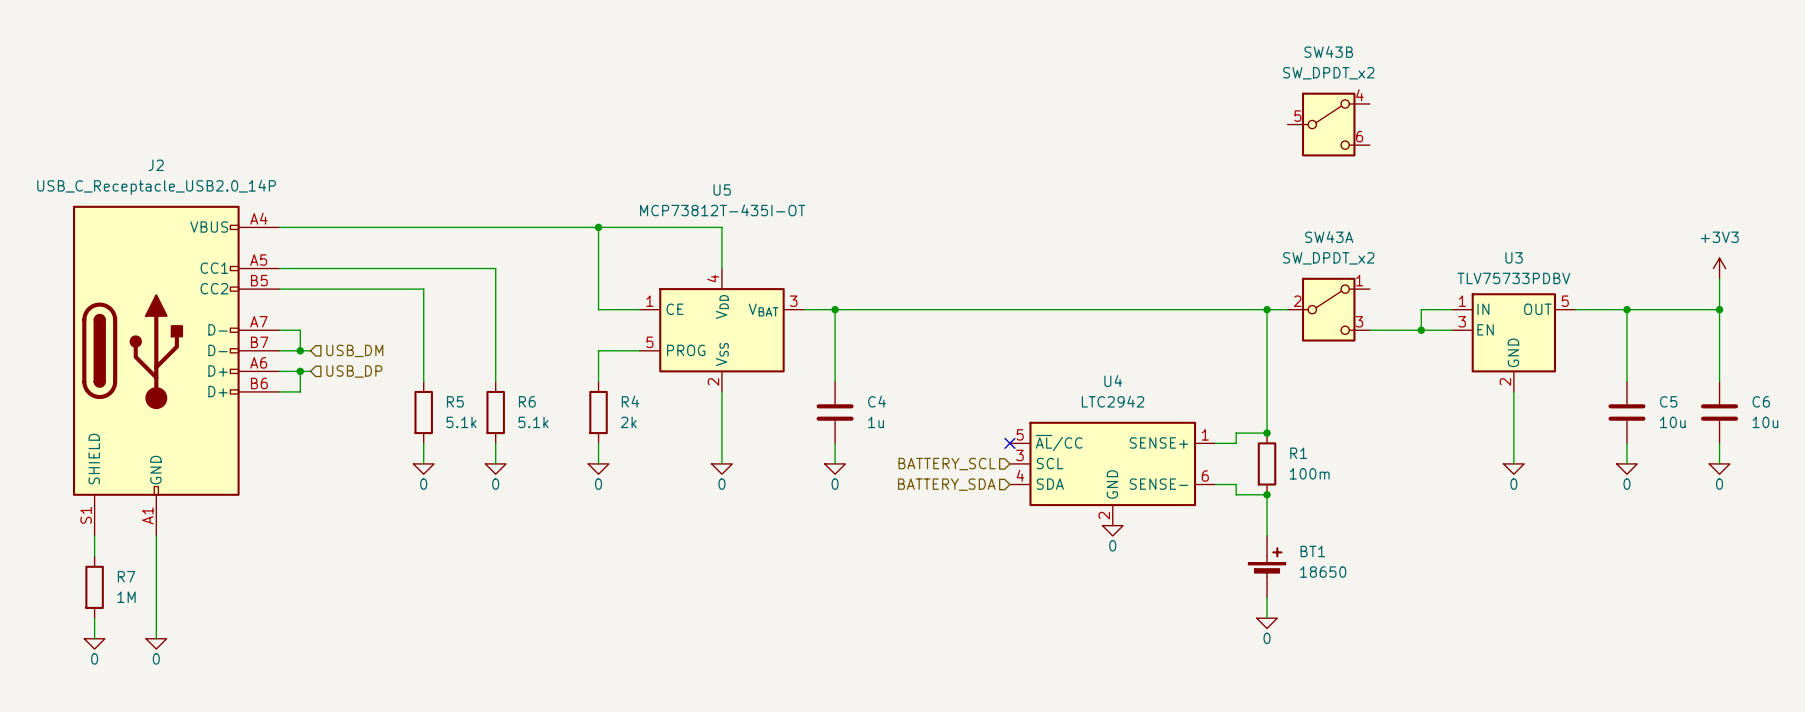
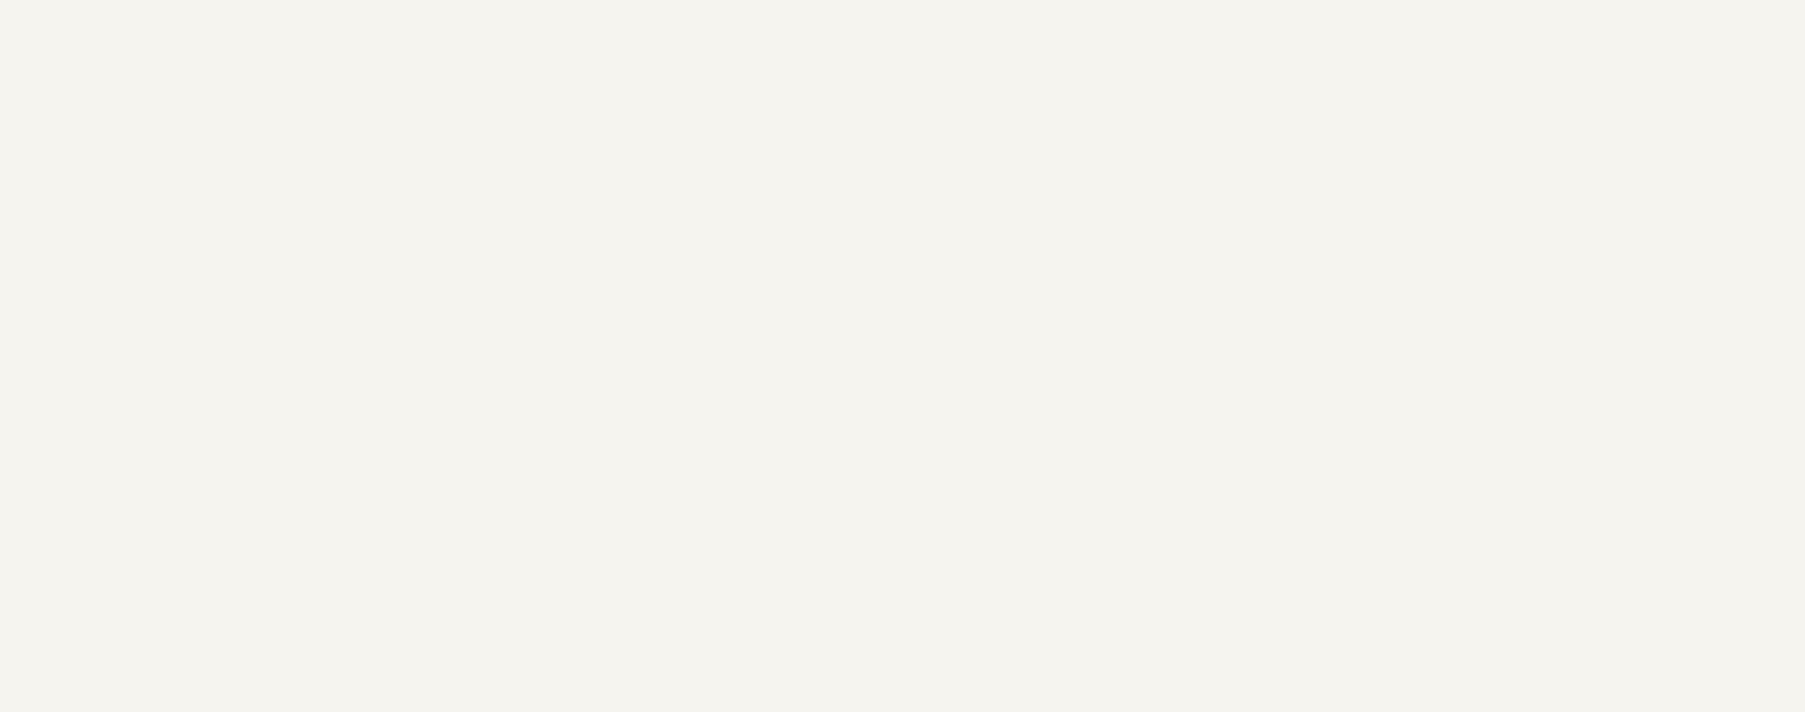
SW43B: SW_DPDT_x2 (1328, 124) -> none
wire: (279, 227) (721, 227) (721, 268) -> none
wire: (598, 227) (598, 309) (639, 309) -> none
junction: (598, 227) -> none
wire: (279, 268) (495, 268) (495, 381) -> none
power symbol: +3V3 (1719, 268) -> none
wire: (1719, 278) (1719, 381) -> none
wire: (279, 289) (423, 289) (423, 381) -> none
wire: (804, 309) (1287, 309) -> none
wire: (835, 309) (835, 381) -> none
junction: (835, 309) -> none
wire: (1267, 309) (1267, 433) (1236, 433) (1236, 443) (1215, 443) -> none
junction: (1267, 309) -> none
SW43A: SW_DPDT_x2 (1328, 309) -> none
wire: (1452, 309) (1421, 309) (1421, 330) -> none
wire: (1575, 309) (1719, 309) -> none
wire: (1626, 309) (1626, 381) -> none
junction: (1626, 309) -> none
junction: (1719, 309) -> none
wire: (279, 330) (300, 330) (300, 350) -> none
U5: MCP73812T-435I-OT (721, 330) -> none
wire: (1369, 330) (1452, 330) -> none
junction: (1421, 330) -> none
U3: TLV75733PDBV (1513, 342) -> none
wire: (279, 350) (310, 350) -> none
junction: (300, 350) -> none
hierarchical label: USB_DM (354, 350) -> none
wire: (639, 350) (598, 350) (598, 381) -> none
J2: USB_C_Receptacle_USB2.0_14P (176, 370) -> none
wire: (279, 371) (310, 371) -> none
wire: (300, 371) (300, 391) (279, 391) -> none
junction: (300, 371) -> none
hierarchical label: USB_DP (354, 371) -> none
wire: (721, 391) (721, 463) -> none
wire: (1513, 391) (1513, 463) -> none
R5: 5.1k (423, 412) -> none
R6: 5.1k (495, 412) -> none
R4: 2k (598, 412) -> none
C4: 1u (835, 412) -> none
C5: 10u (1626, 412) -> none
C6: 10u (1719, 412) -> none
junction: (1267, 433) -> none
wire: (423, 443) (423, 463) -> none
wire: (495, 443) (495, 463) -> none
wire: (598, 443) (598, 463) -> none
wire: (835, 443) (835, 463) -> none
no-connect mark: (1009, 443) -> none
wire: (1626, 443) (1626, 463) -> none
wire: (1719, 443) (1719, 463) -> none
R1: 100m (1267, 463) -> none
hierarchical label: BATTERY_SCL (947, 464) -> none
power symbol: 0 (423, 469) -> none
power symbol: 0 (495, 469) -> none
power symbol: 0 (598, 469) -> none
power symbol: 0 (721, 469) -> none
power symbol: 0 (835, 469) -> none
power symbol: 0 (1513, 469) -> none
power symbol: 0 (1626, 469) -> none
power symbol: 0 (1719, 469) -> none
U4: LTC2942 (1112, 473) -> none
hierarchical label: BATTERY_SDA (946, 484) -> none
wire: (1215, 484) (1236, 484) (1236, 494) (1267, 494) (1267, 535) -> none
junction: (1267, 494) -> none
power symbol: 0 (1112, 530) -> none
wire: (94, 535) (94, 556) -> none
wire: (156, 535) (156, 638) -> none
BT1: 18650 (1267, 566) -> none
R7: 1M (94, 587) -> none
wire: (1267, 597) (1267, 618) -> none
wire: (94, 618) (94, 638) -> none
power symbol: 0 (1267, 623) -> none
power symbol: 0 (94, 643) -> none
power symbol: 0 (156, 643) -> none

